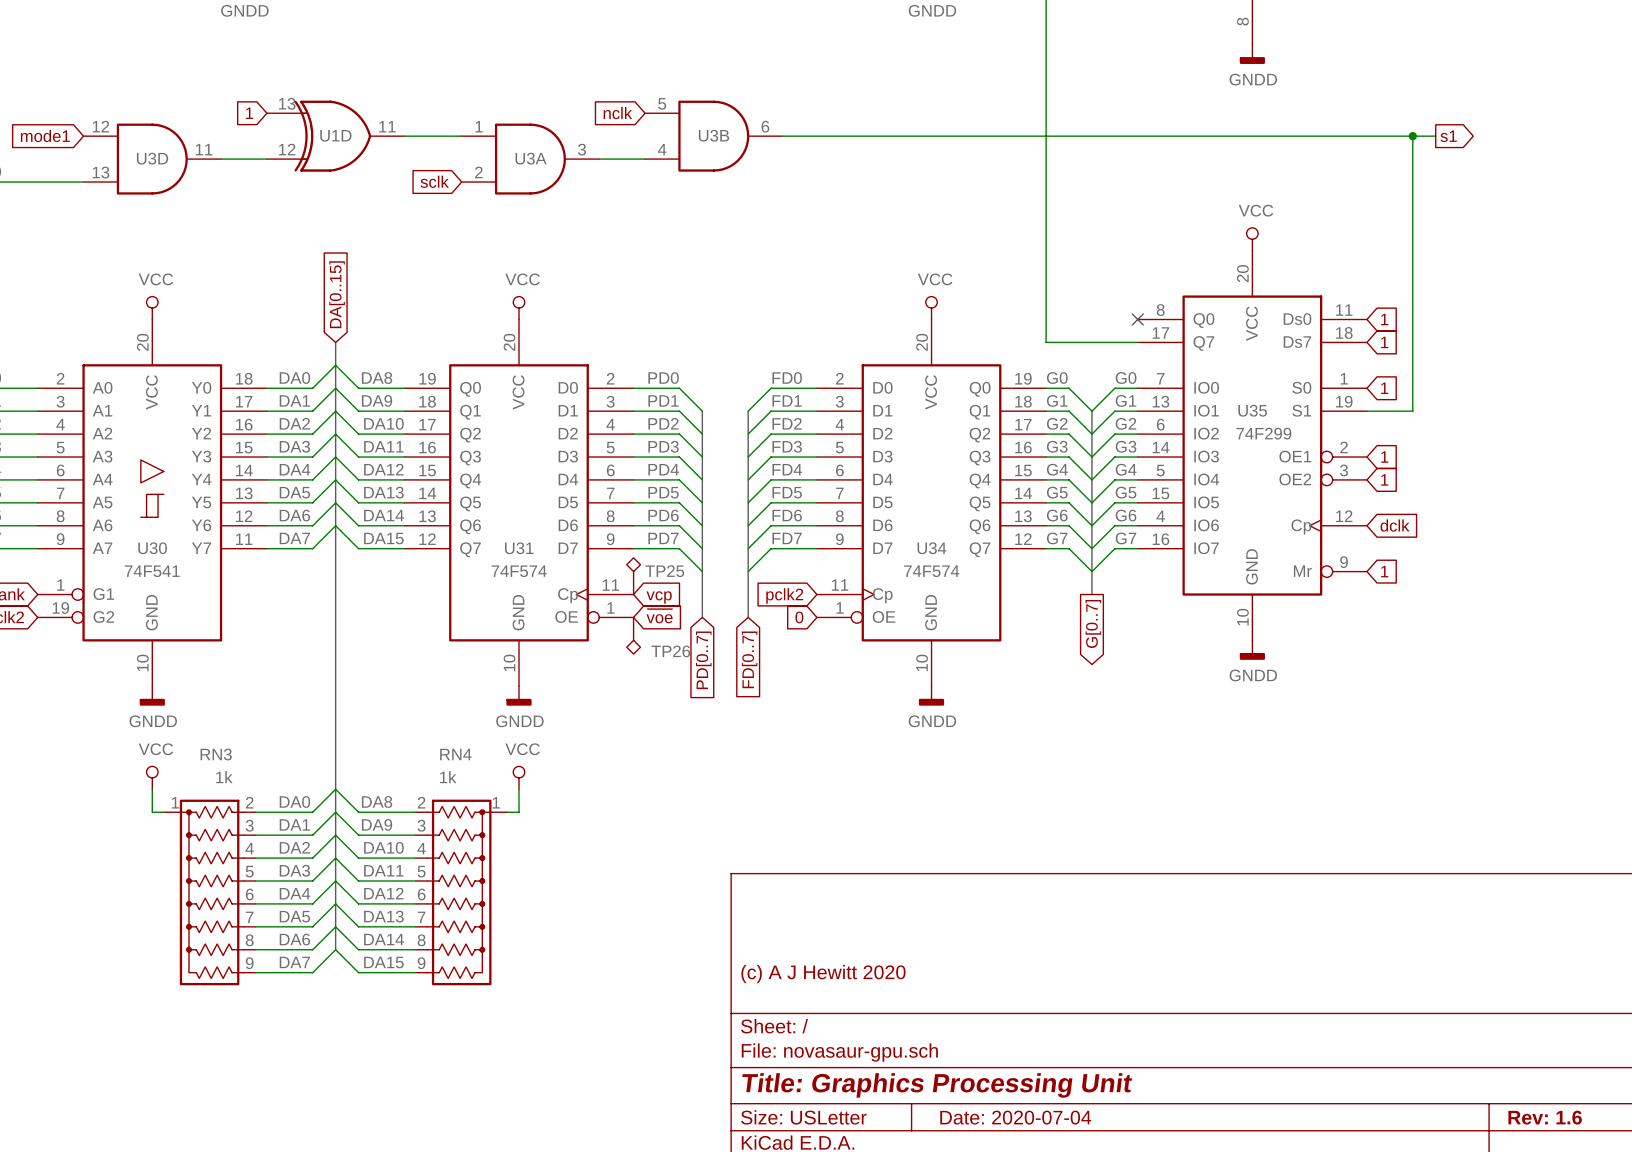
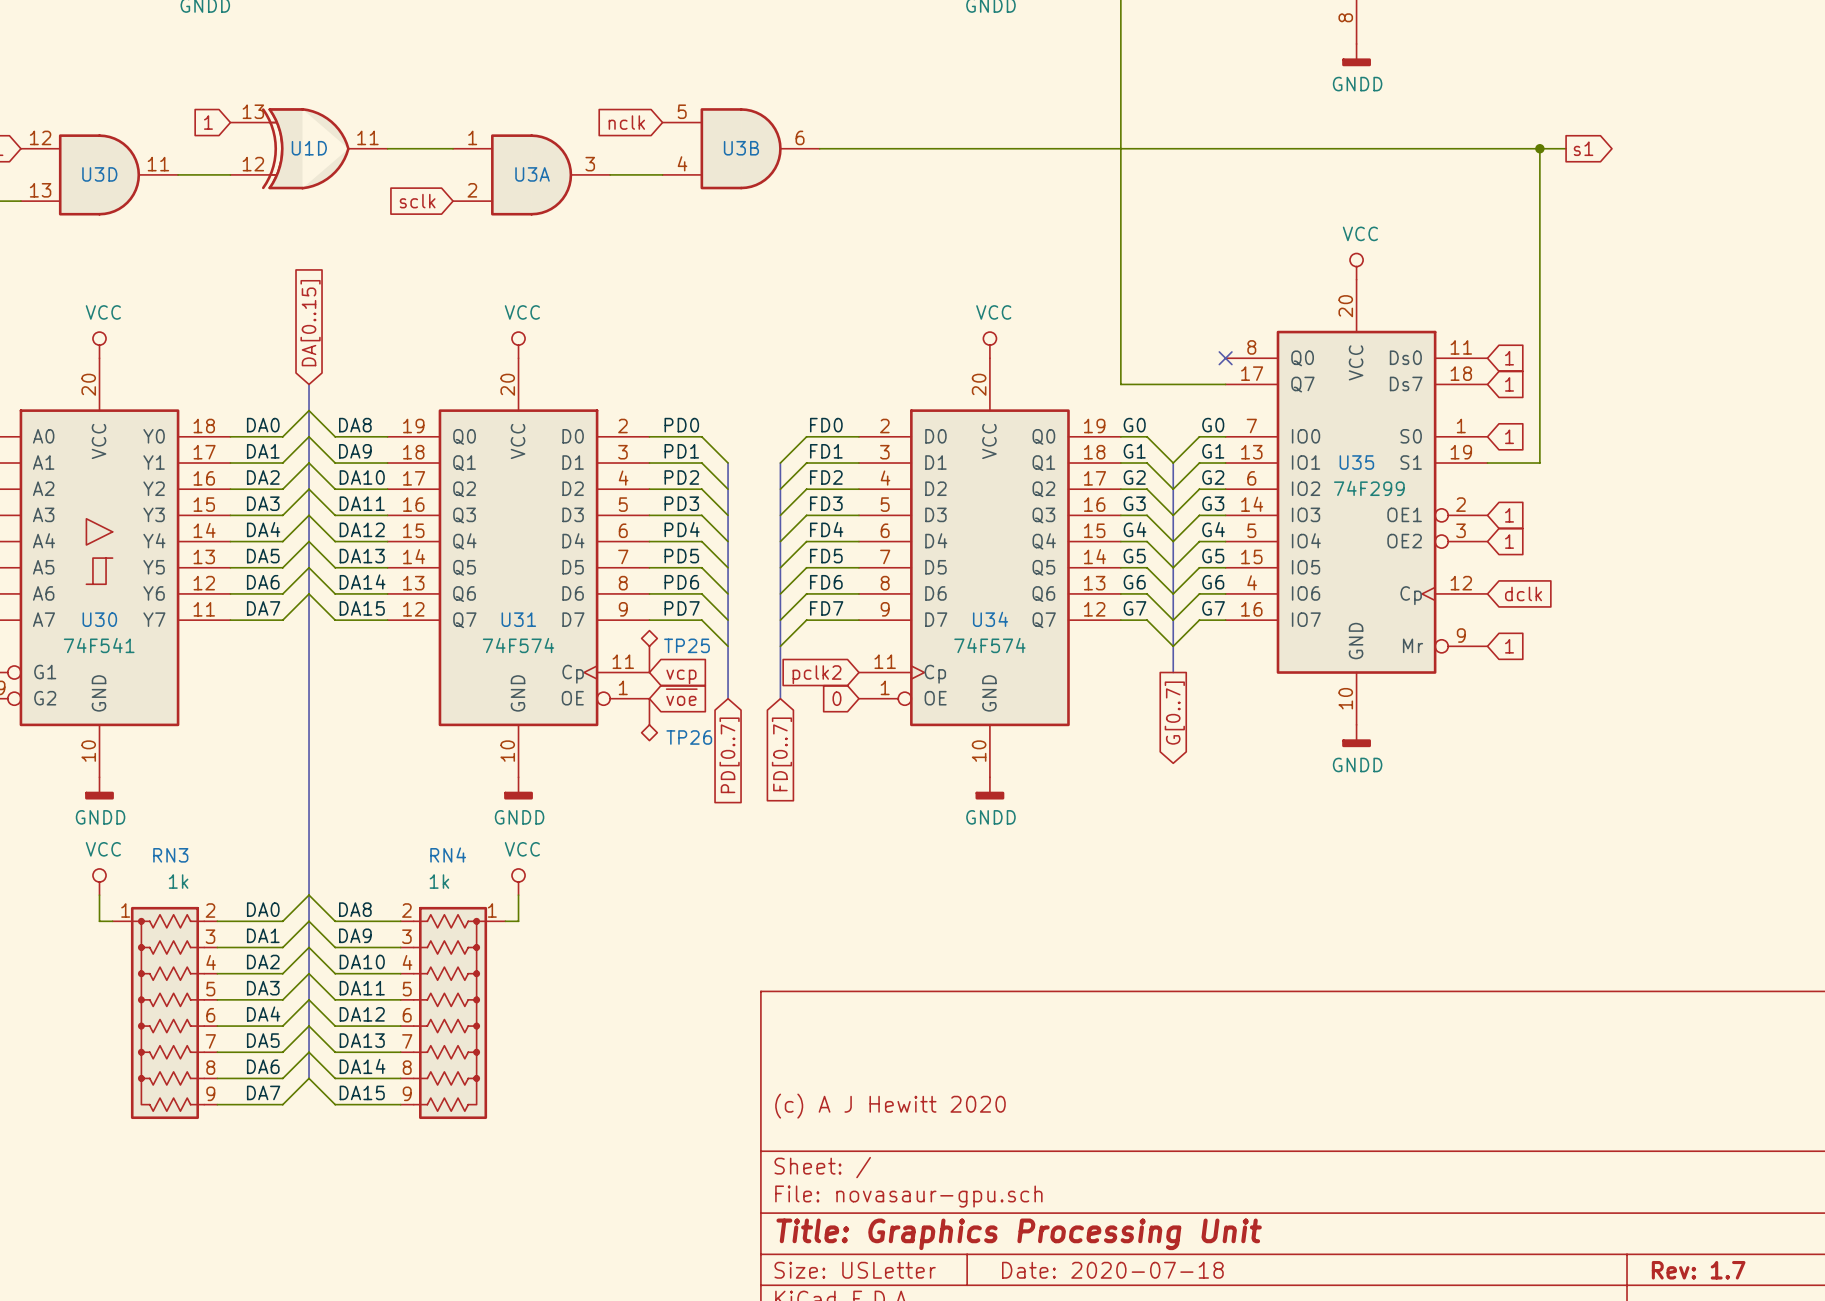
title block: Date: 2020-07-04 (1015, 1117) -> Date: 2020-07-18 (1112, 1270)
title block: Rev: 1.6 (1545, 1117) -> Rev: 1.7 (1698, 1270)

